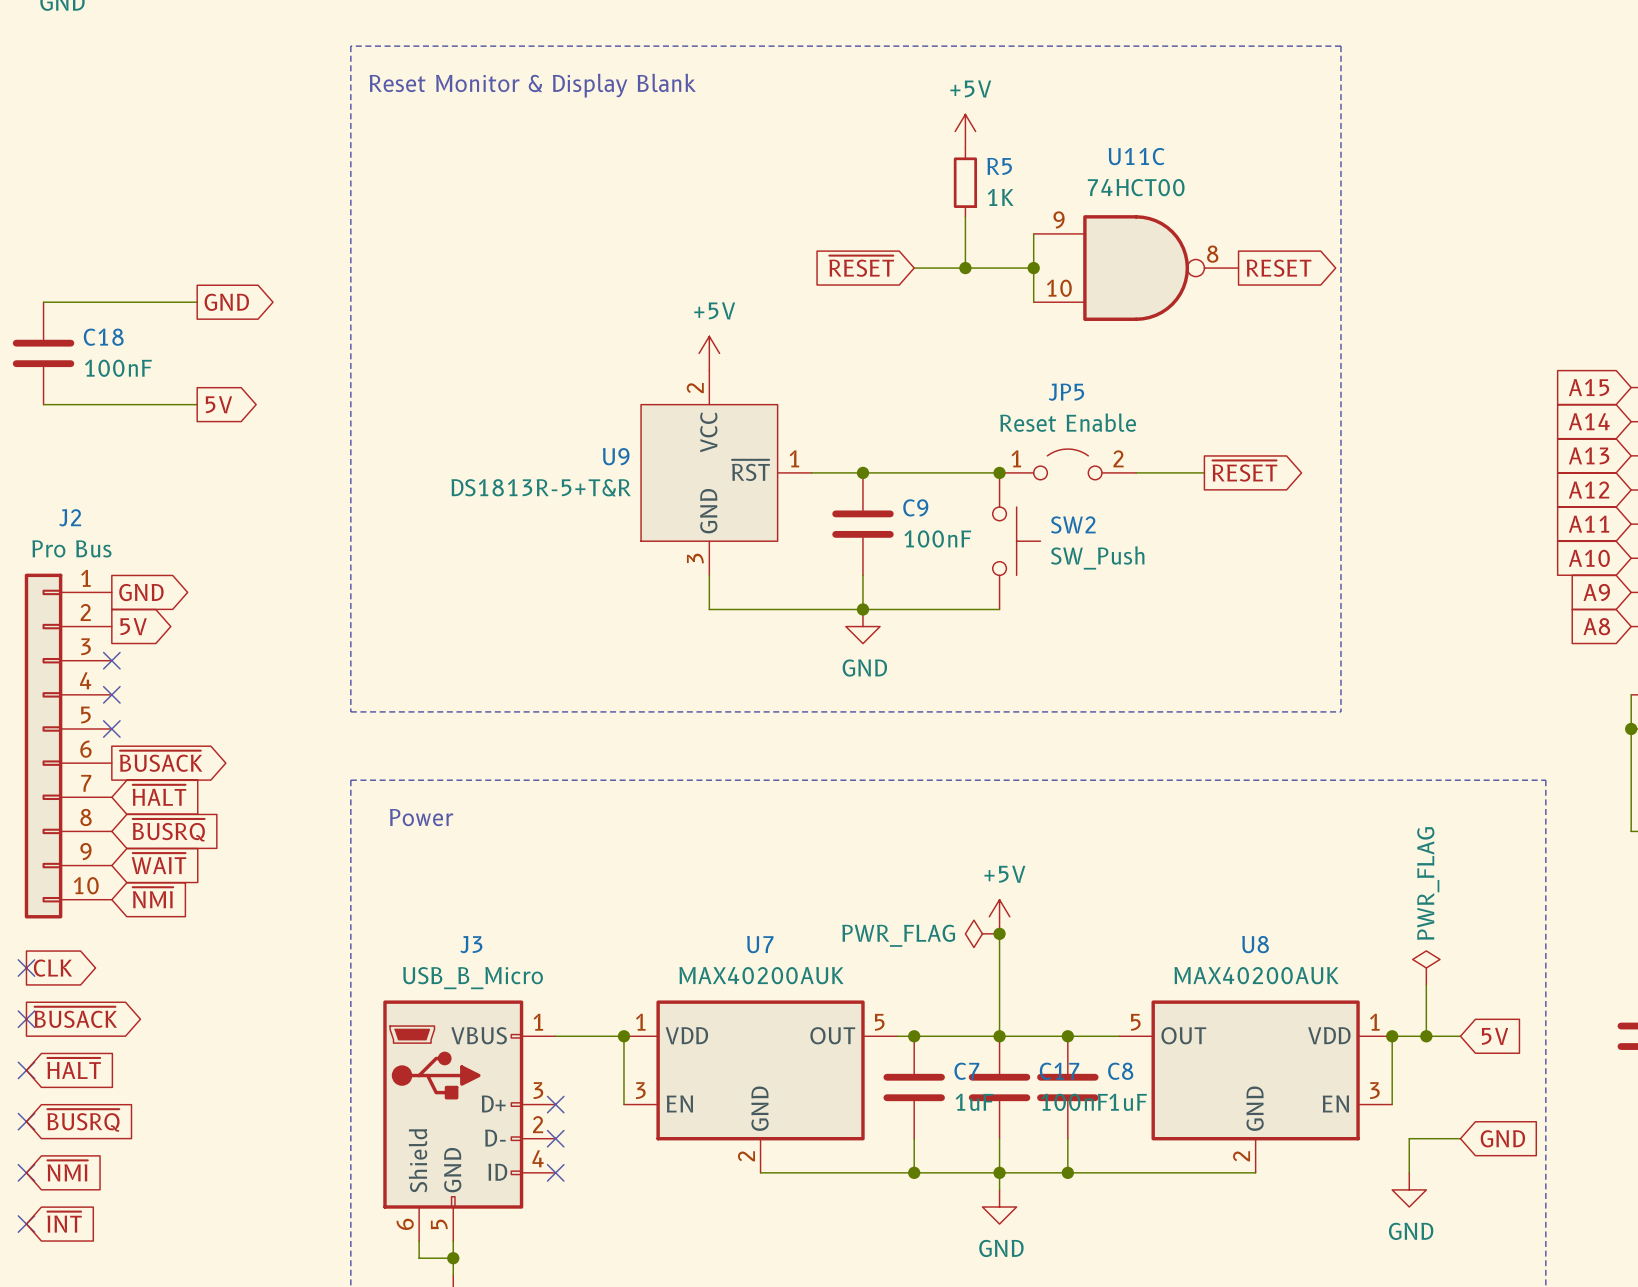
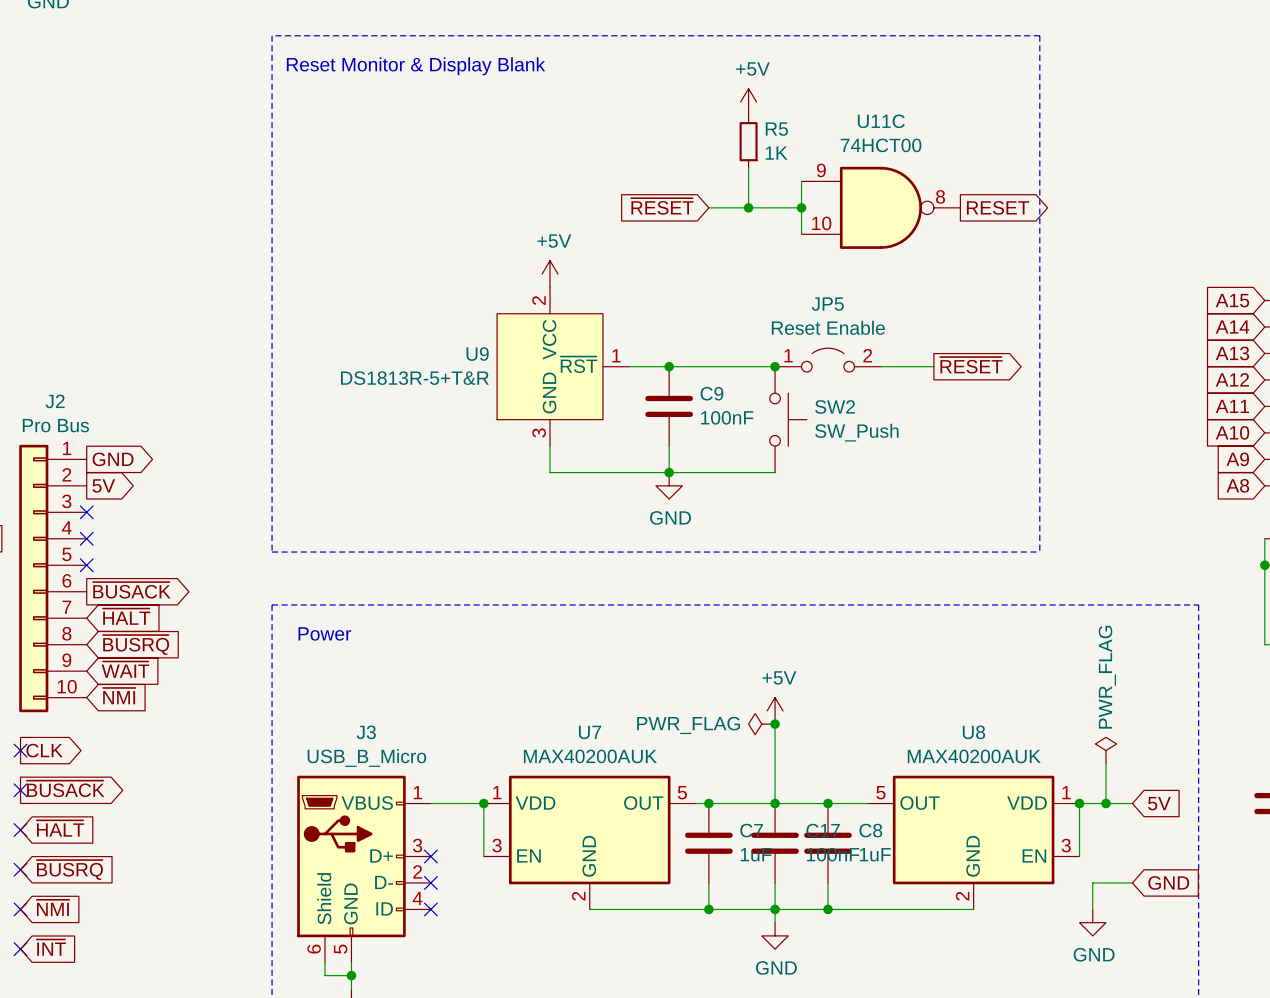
wire: (43, 302) (197, 302) -> none
global label: GND (226, 302) -> none
C18: 100nF (43, 353) -> none
wire: (43, 404) (197, 404) -> none
global label: 5V (218, 404) -> none

